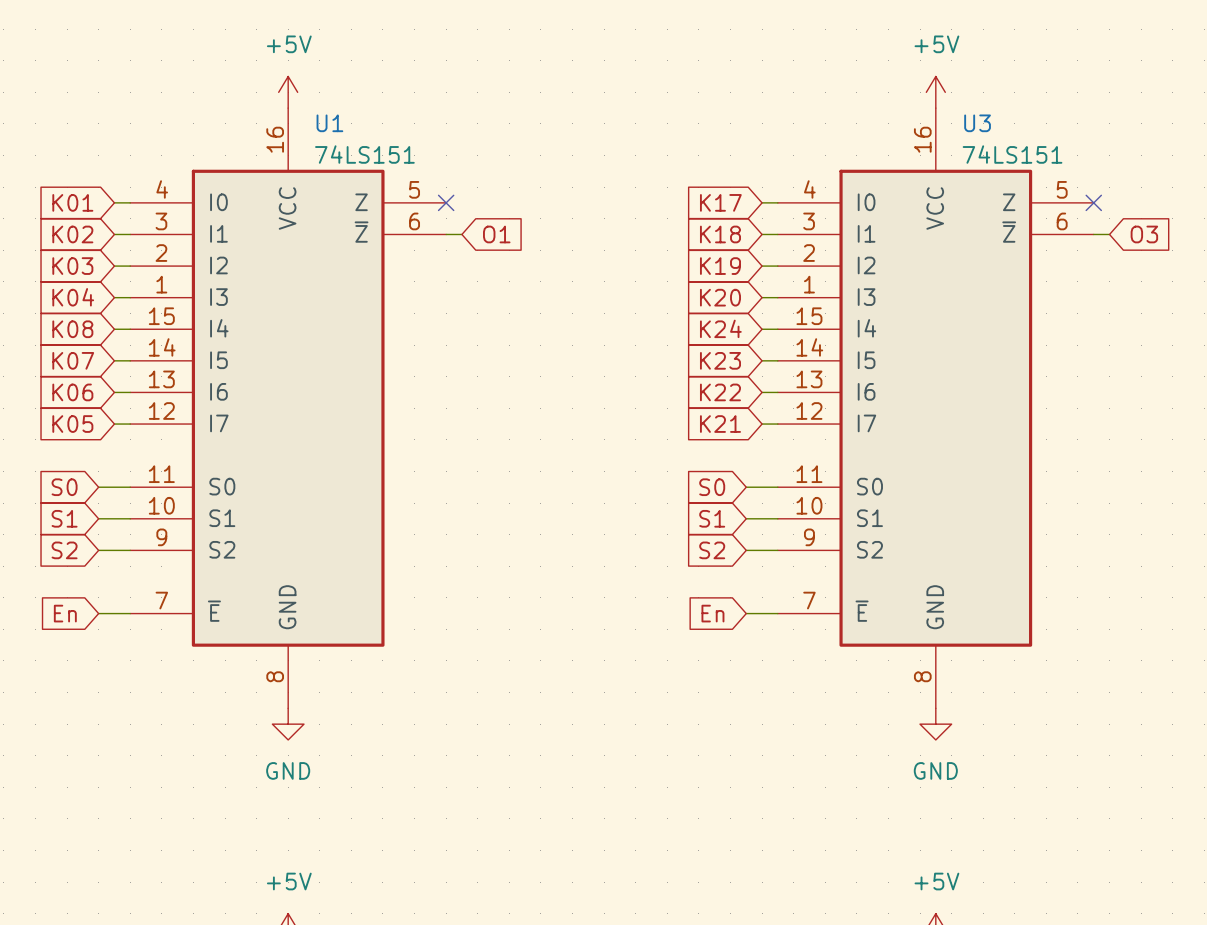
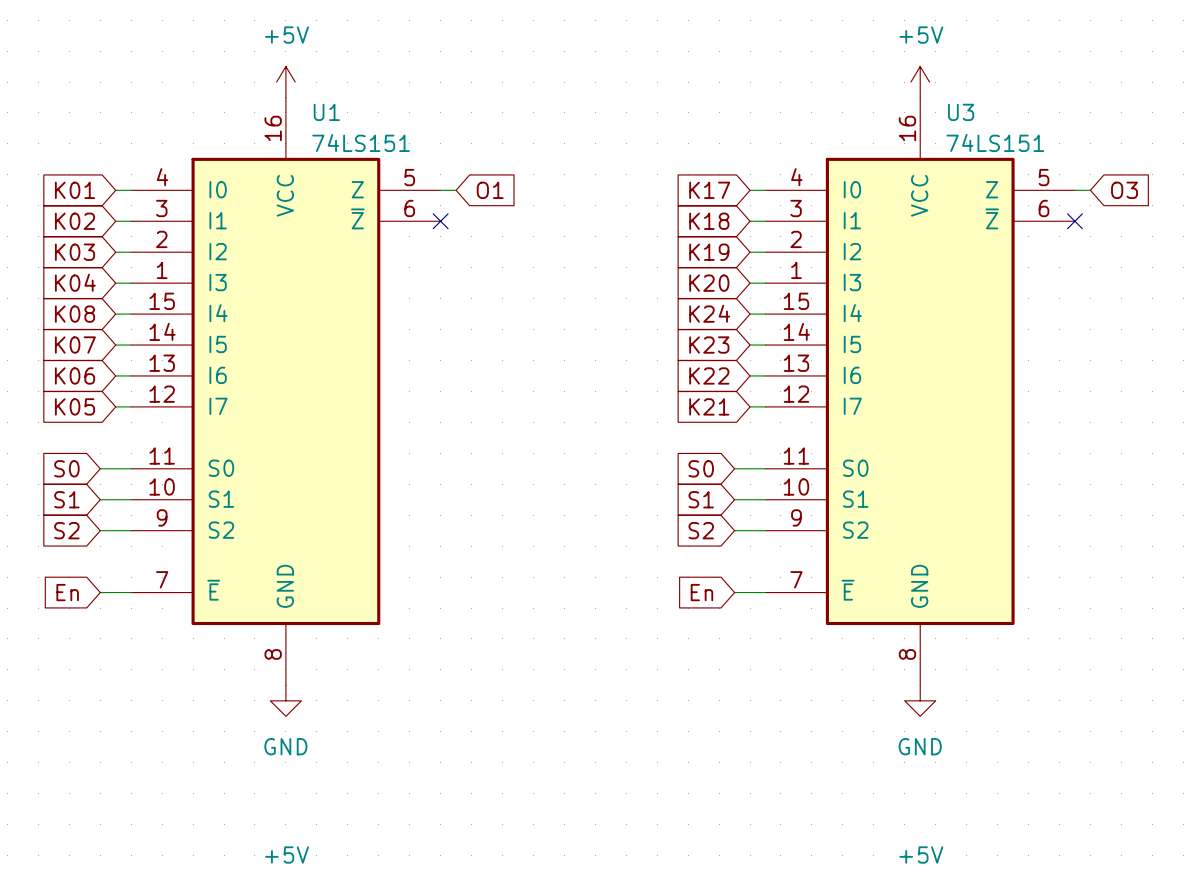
no-connect mark position: (446, 202) -> (440, 221)
no-connect mark position: (1093, 202) -> (1074, 221)
wire: (446, 234) (461, 234) -> (440, 190) (456, 190)
global label position: O1 (496, 234) -> O1 (490, 190)
wire: (1093, 234) (1109, 234) -> (1074, 190) (1090, 190)
global label position: O3 (1144, 234) -> O3 (1124, 190)

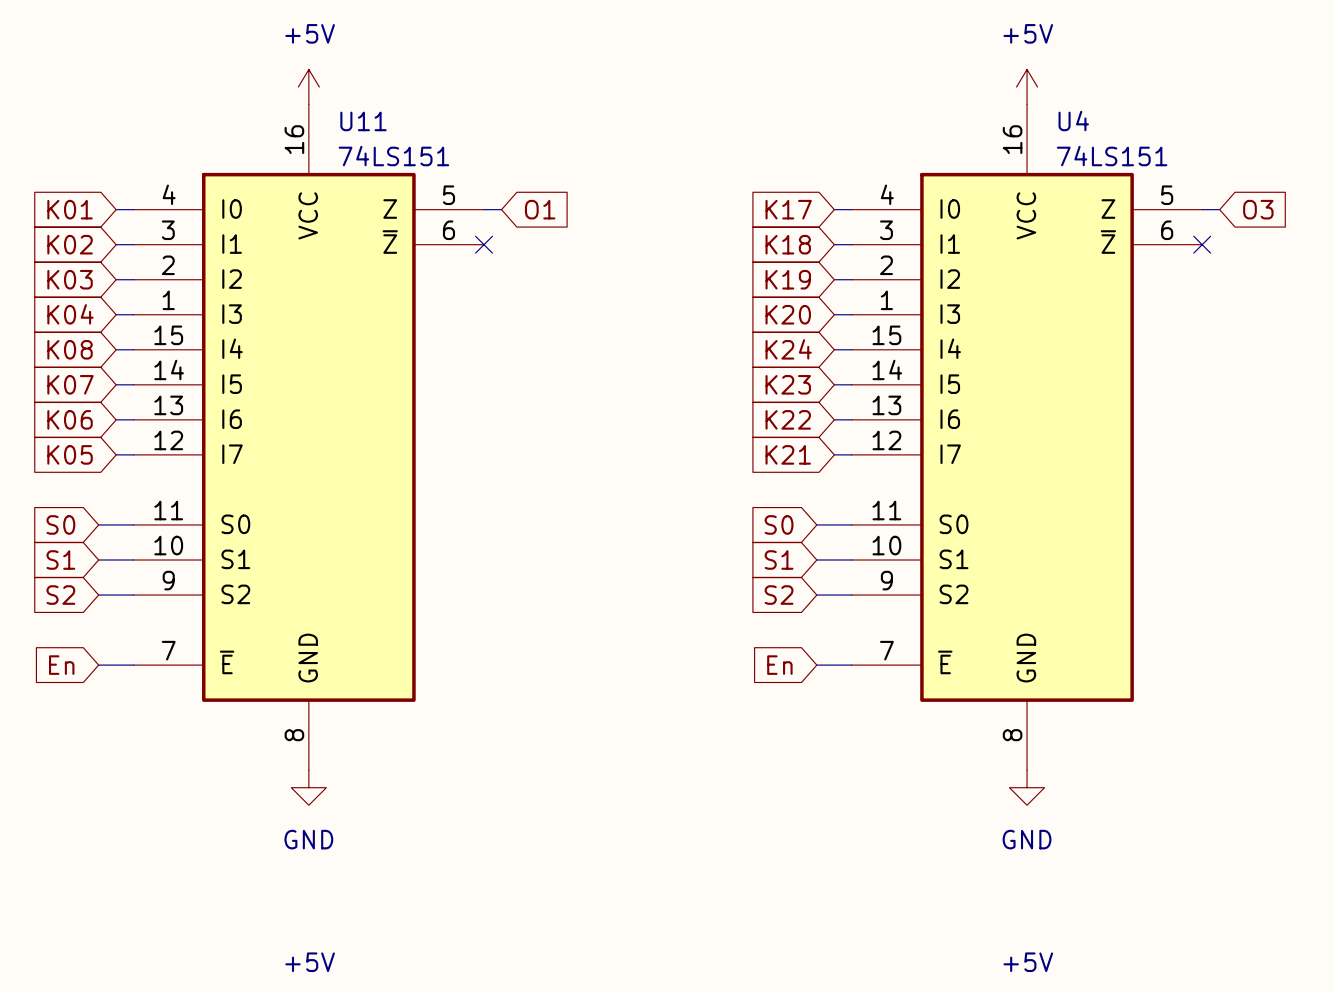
U1 name: U1 (326, 112) -> U11 (363, 121)
U3 name: U3 (961, 112) -> U4 (1073, 121)

